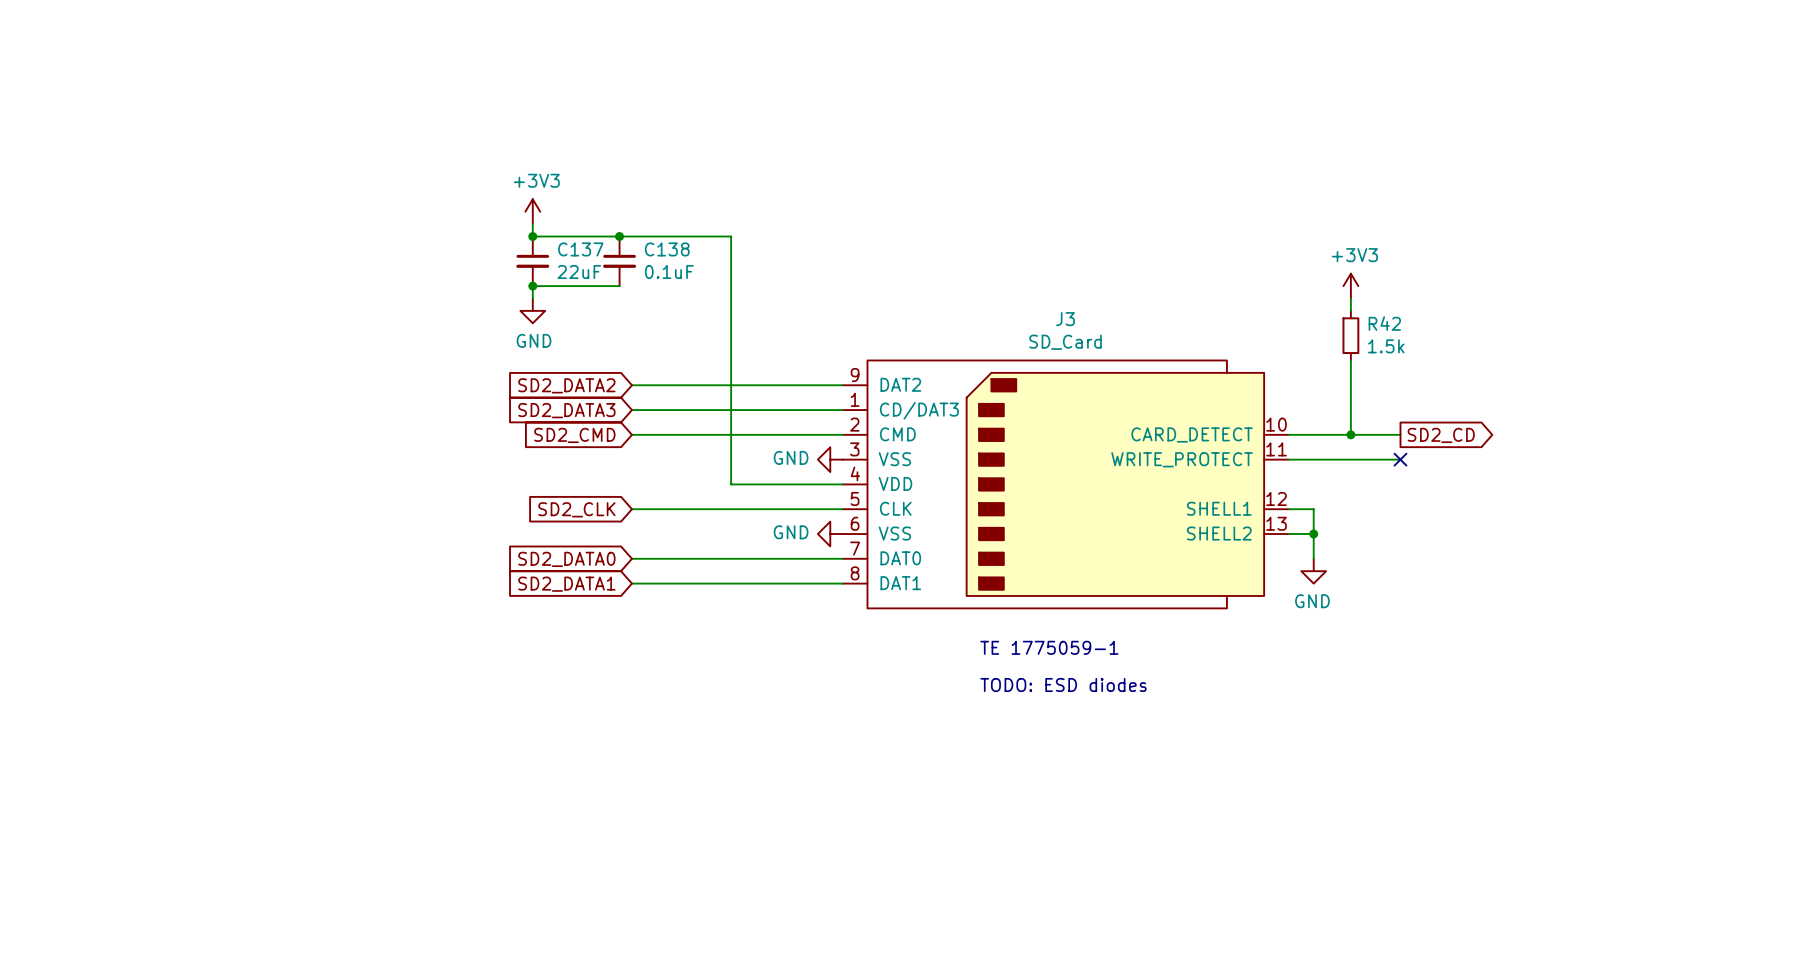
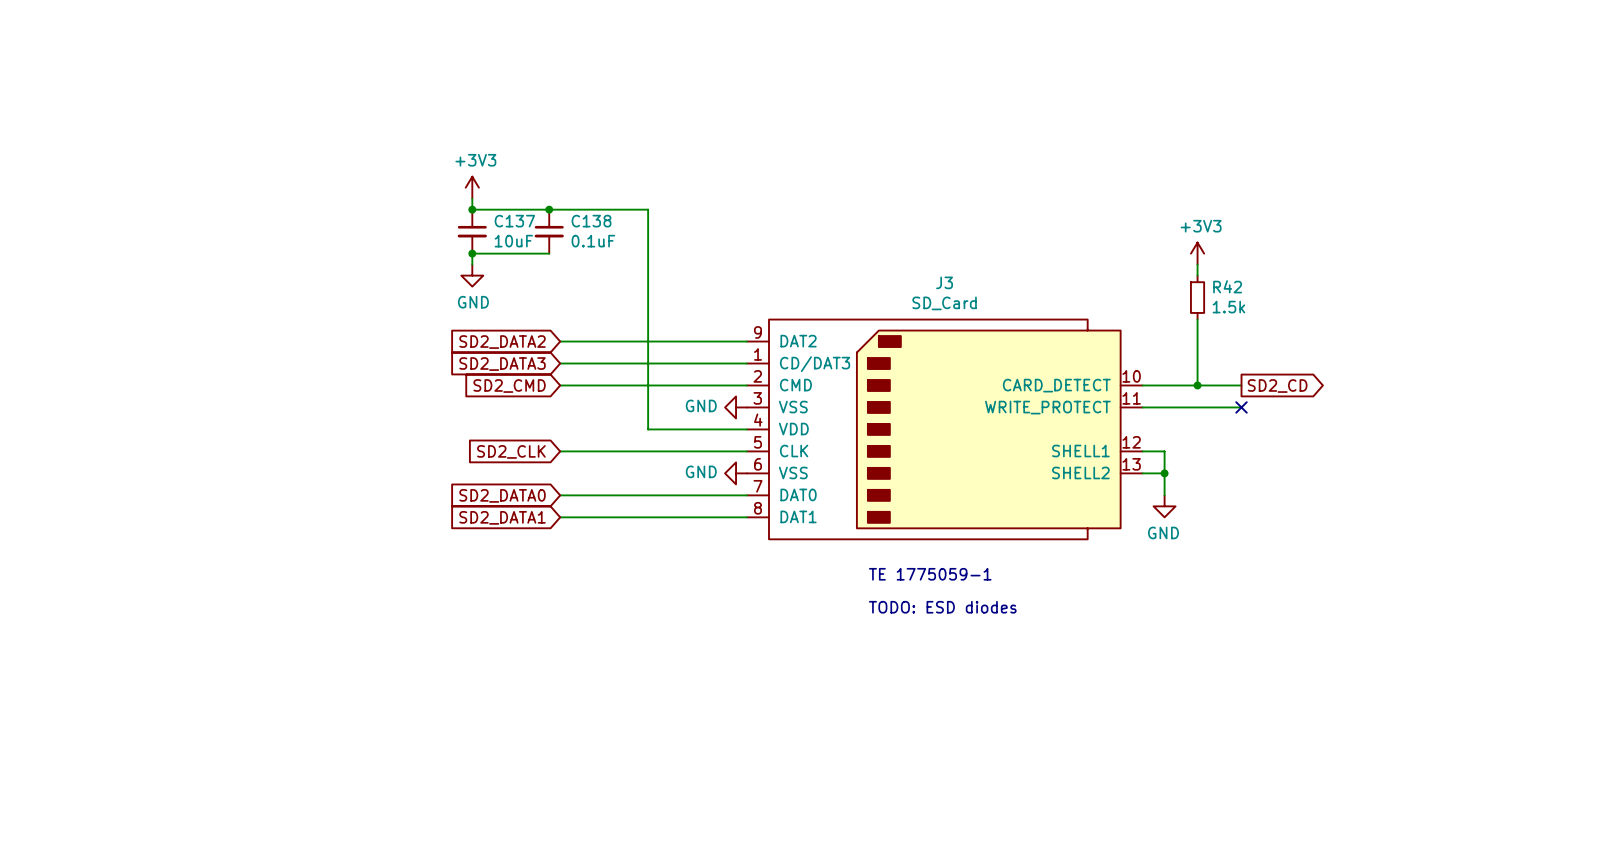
C137 value: 22uF (579, 272) -> 10uF (513, 241)

